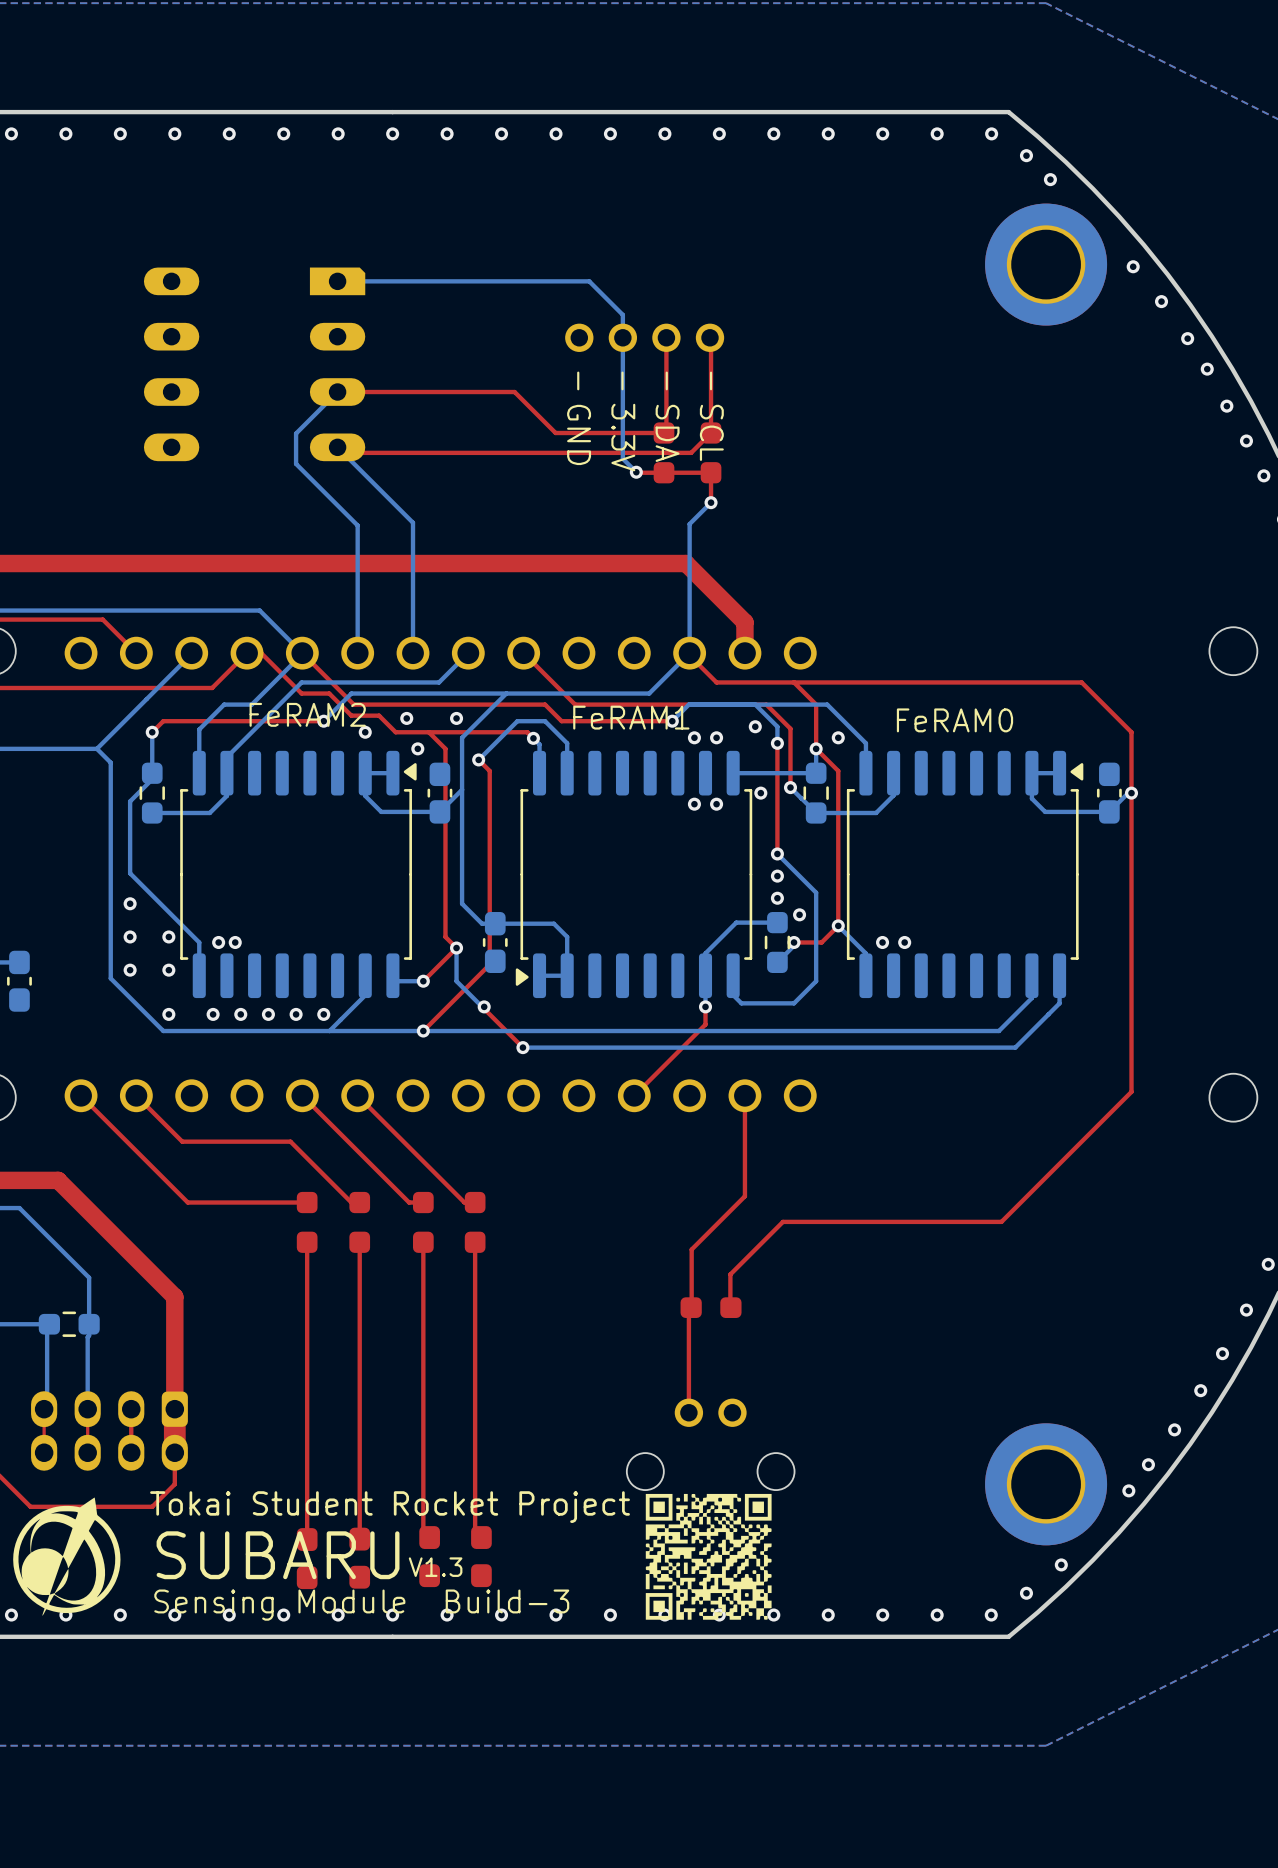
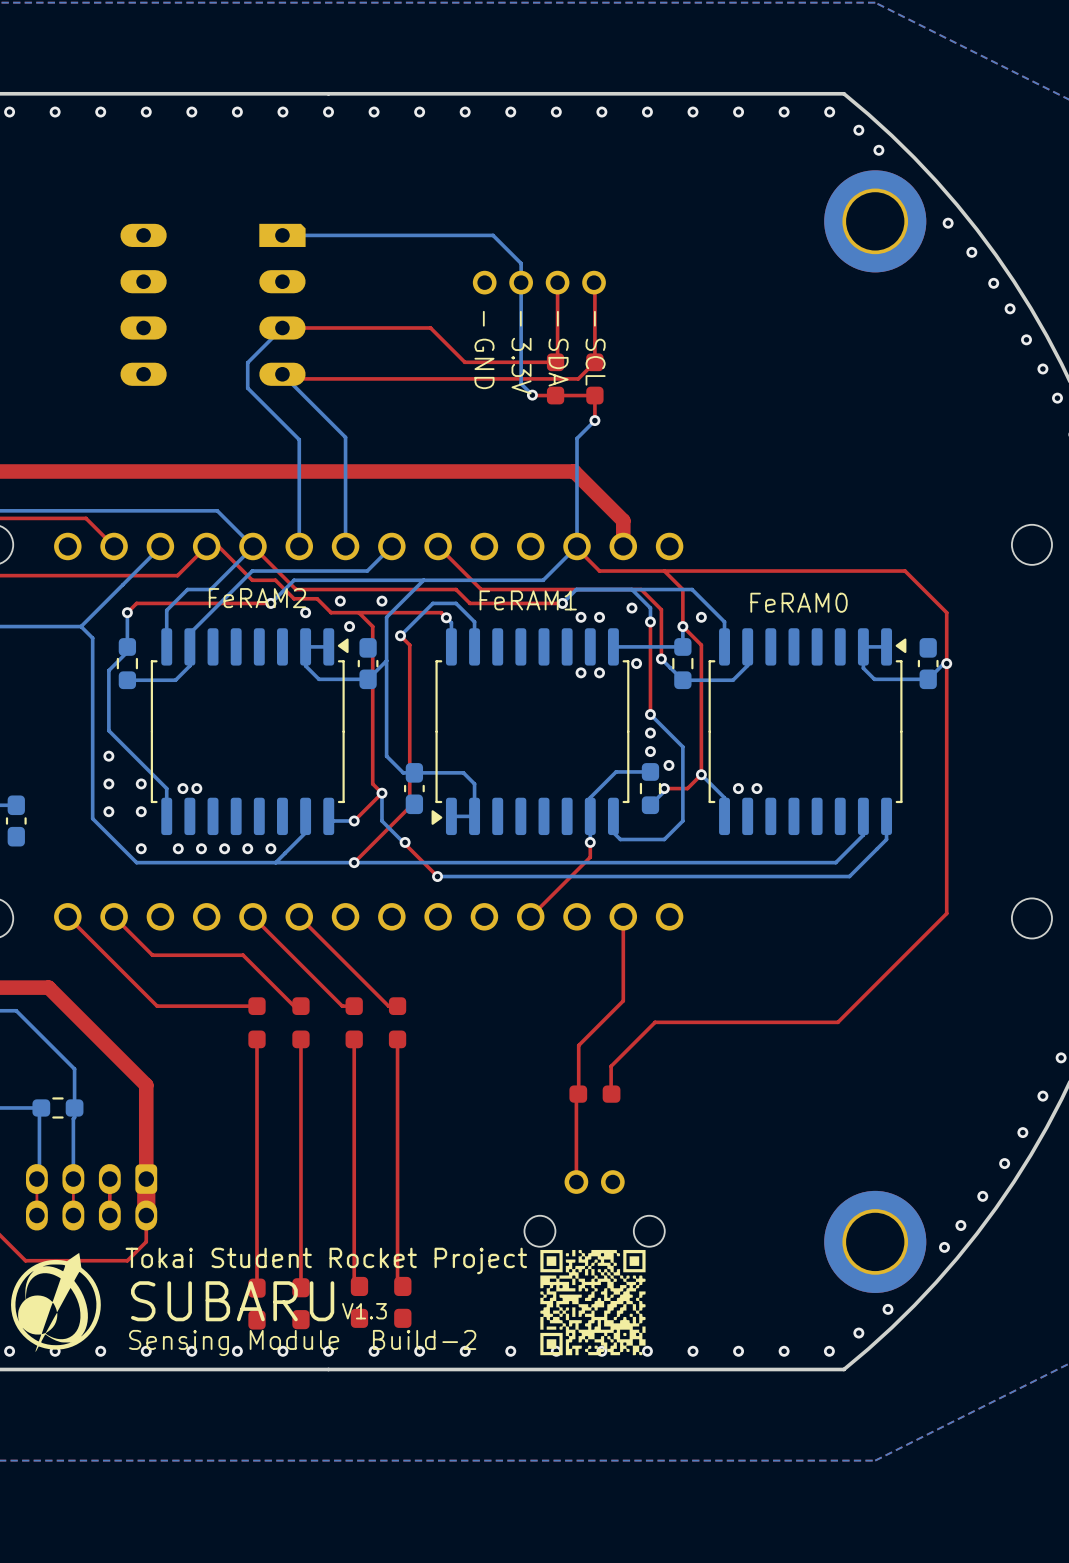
text: Sensing Module Build-3 (361, 1605) -> Sensing Module Build-2 (302, 1342)

